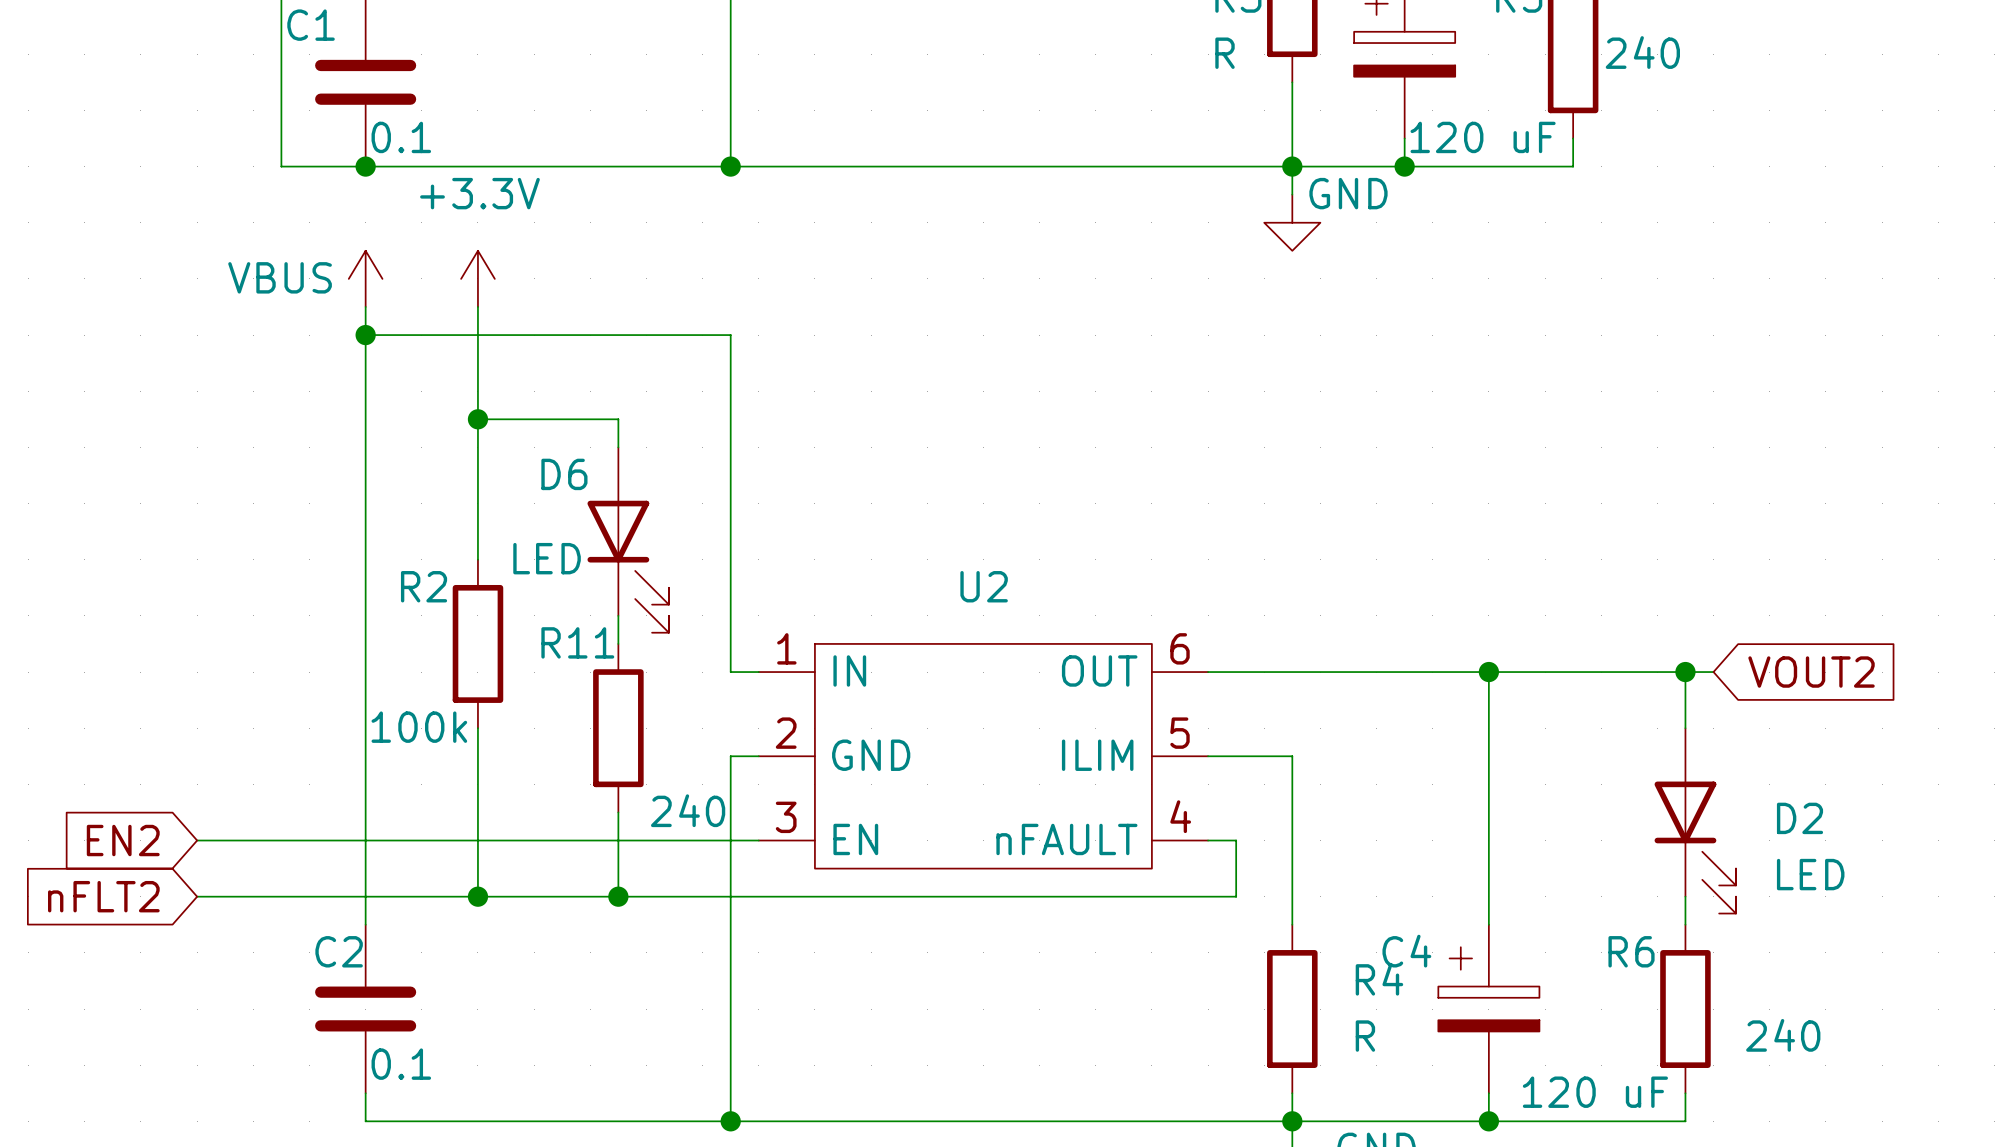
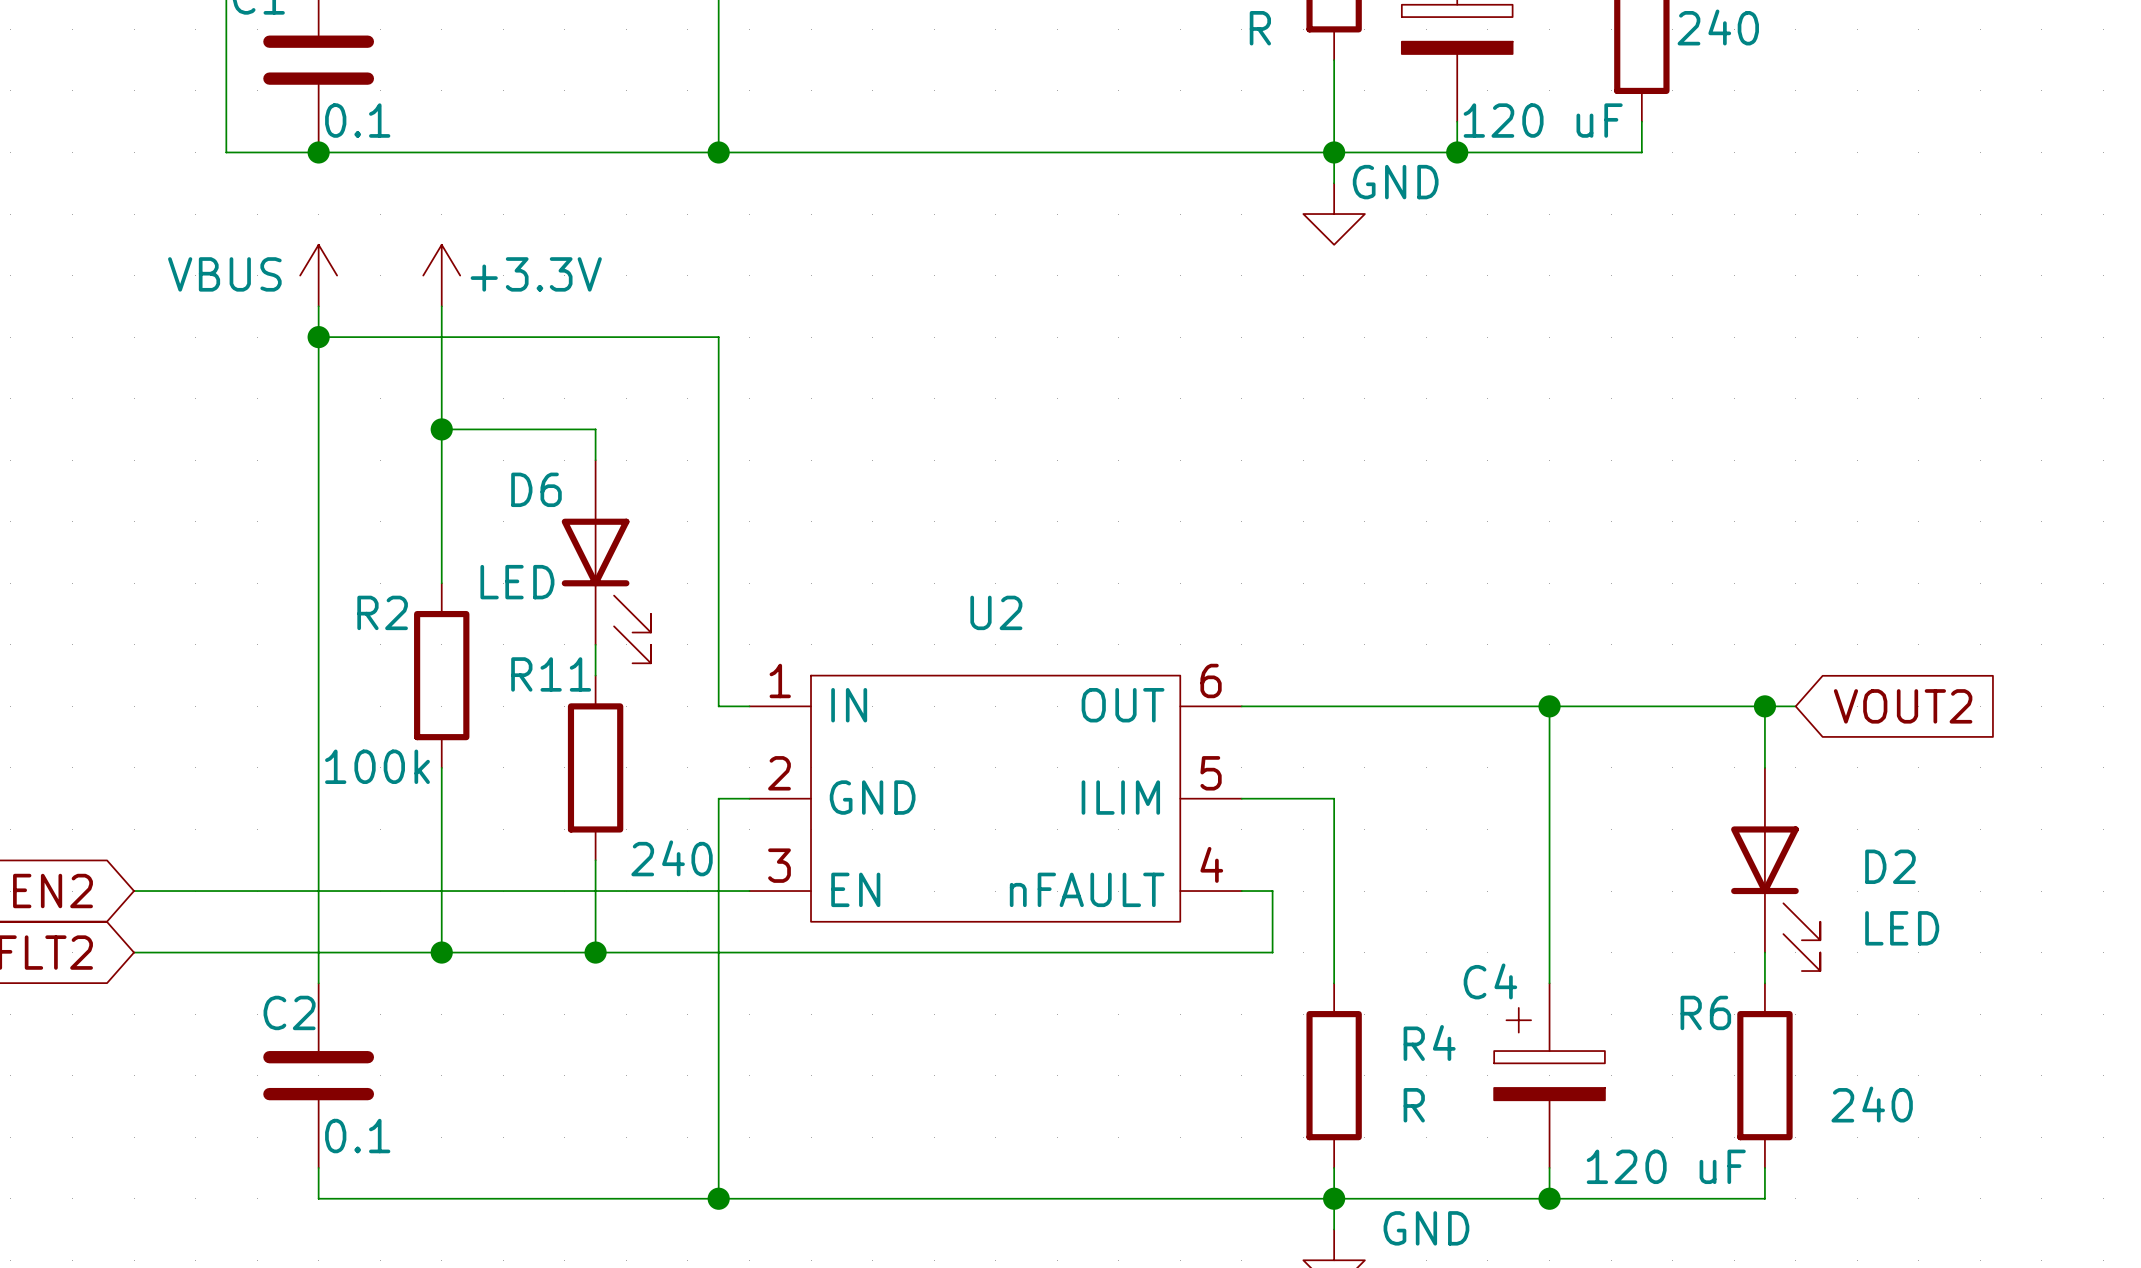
power symbol text position: +3.3V (479, 193) -> +3.3V (536, 274)
C4 name position: C4 (1406, 951) -> C4 (1490, 981)

